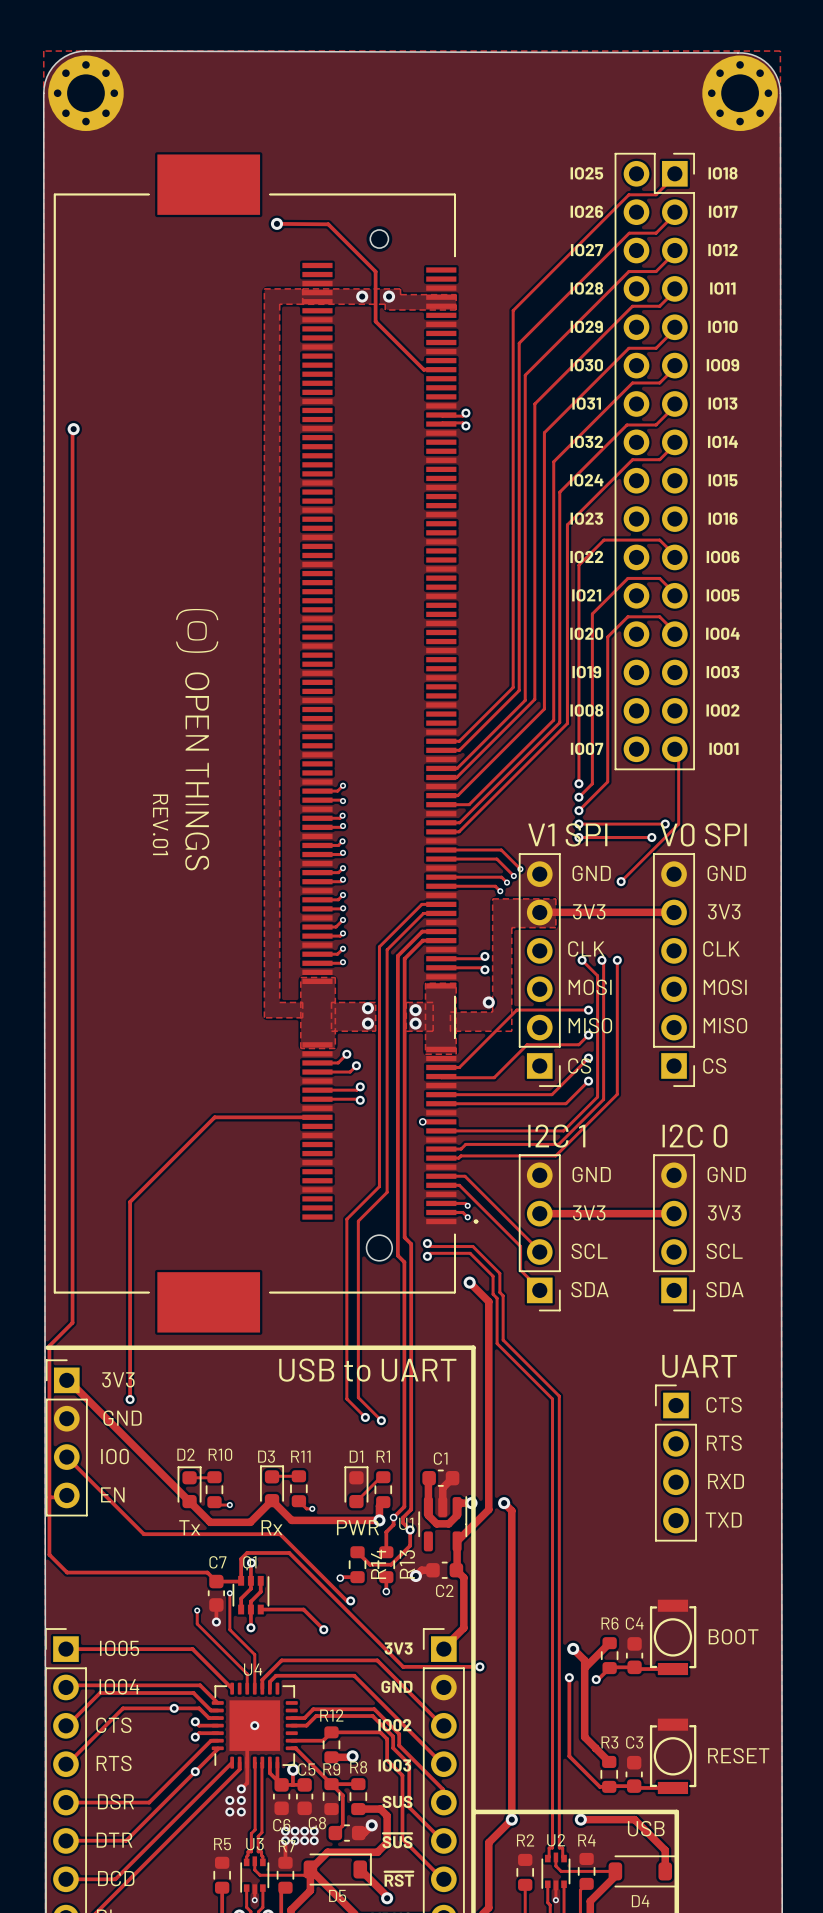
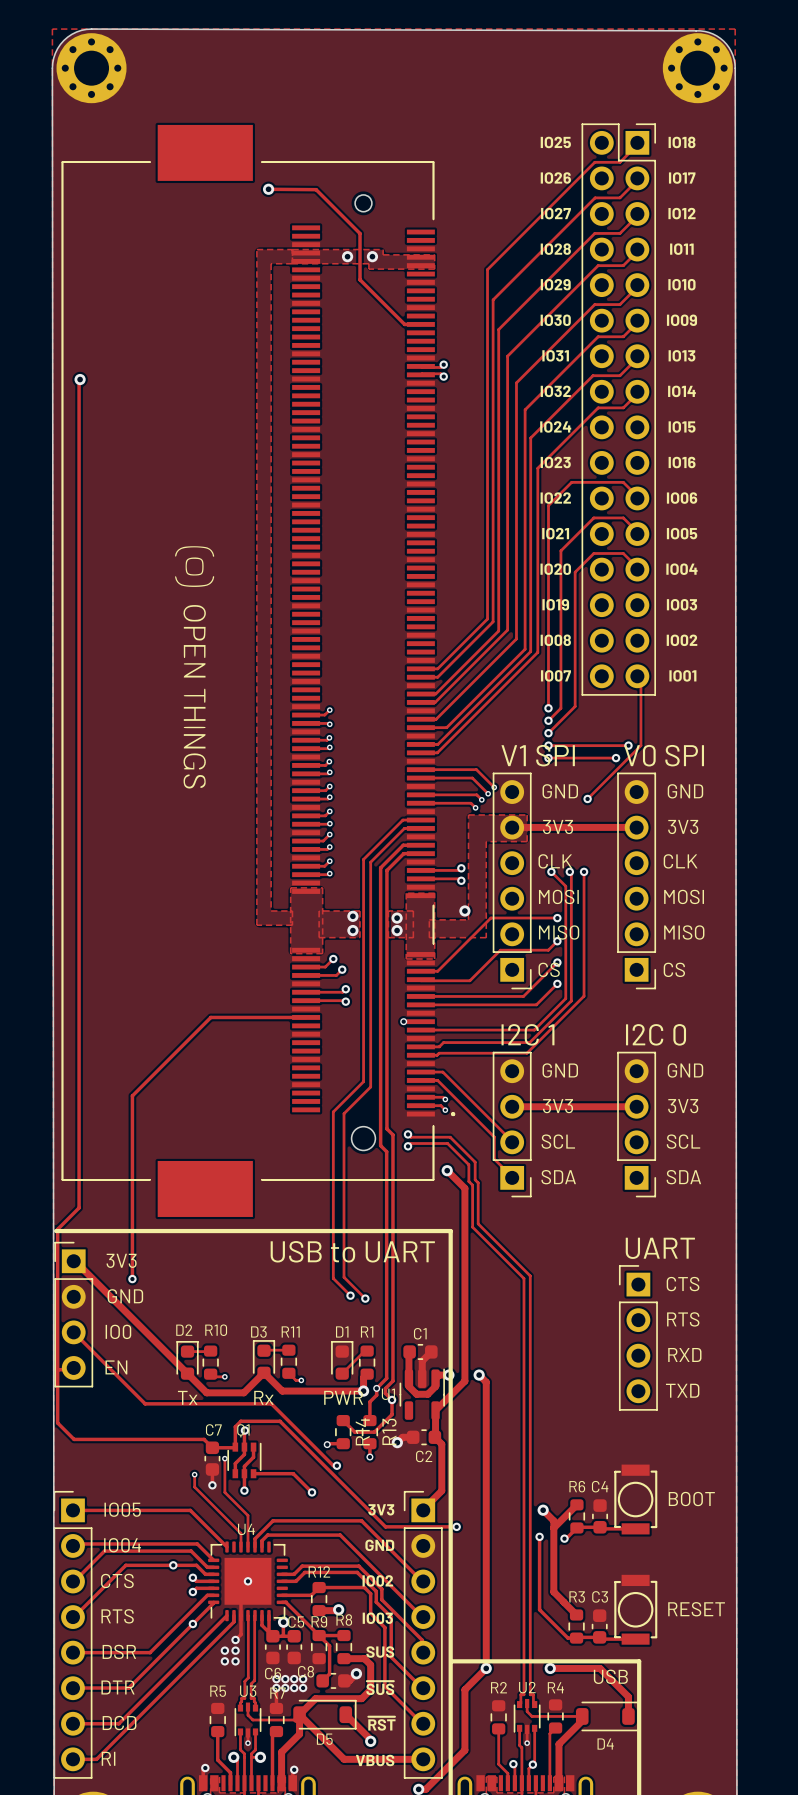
text: REV.01 (160, 824) -> none

